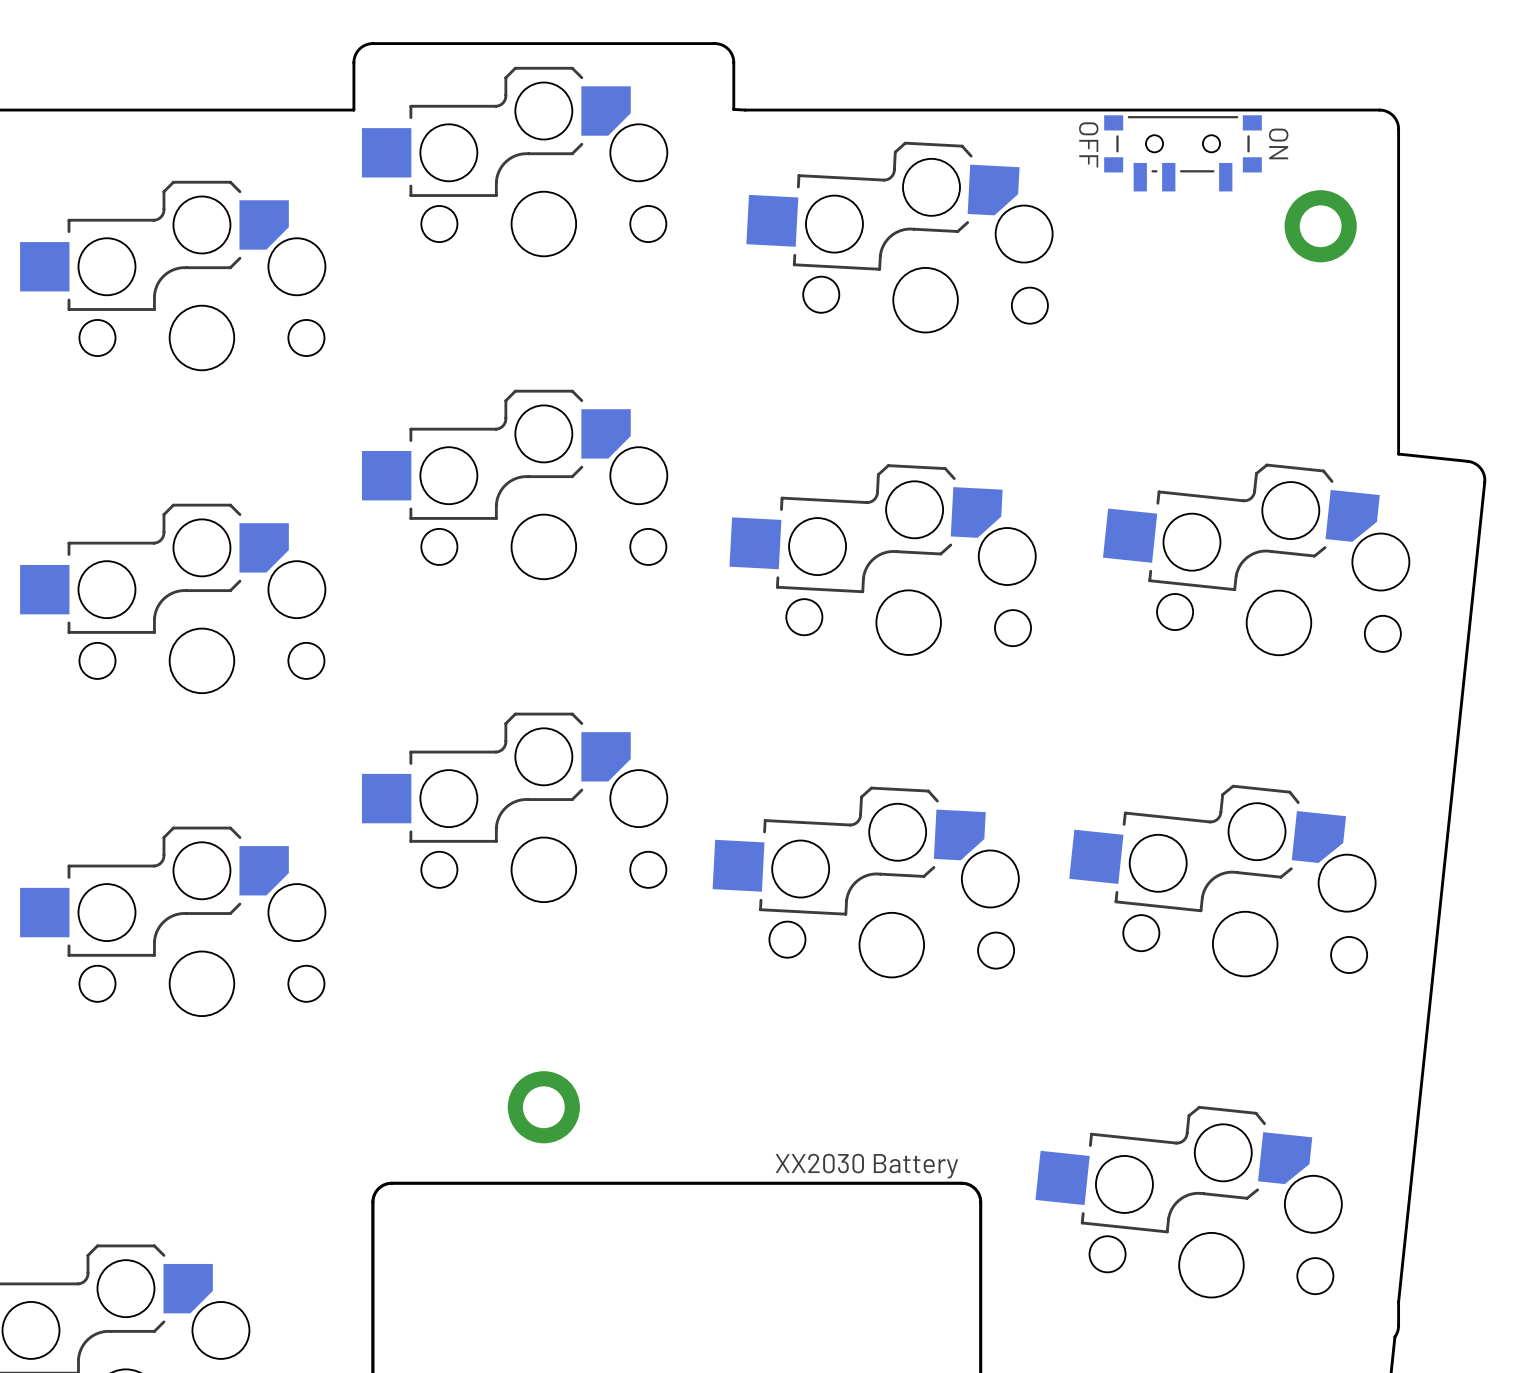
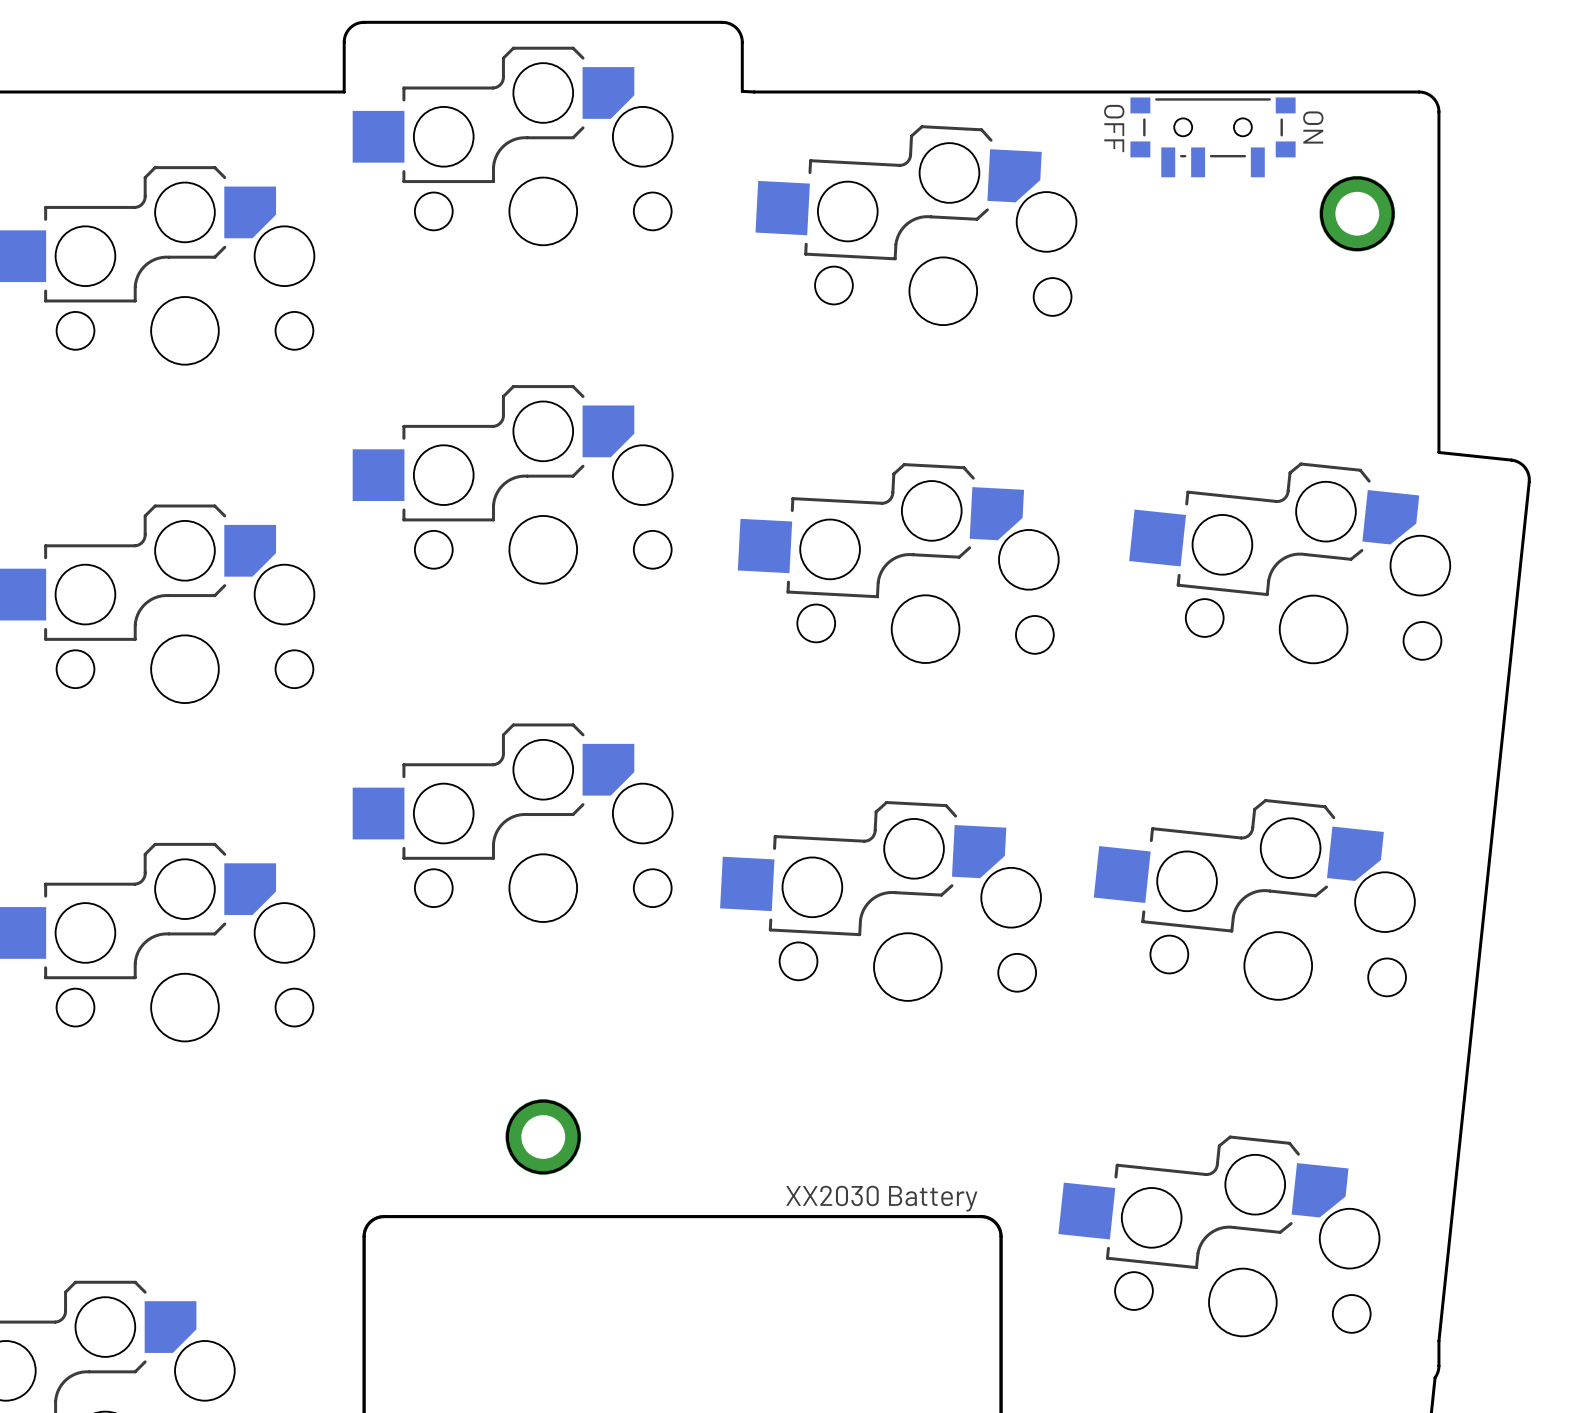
round board edge: none -> [1319, 176, 1395, 252]
round board edge: none -> [505, 1099, 581, 1175]

